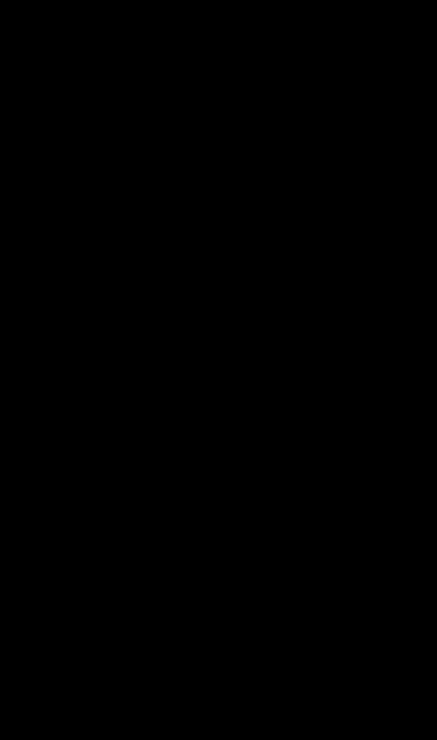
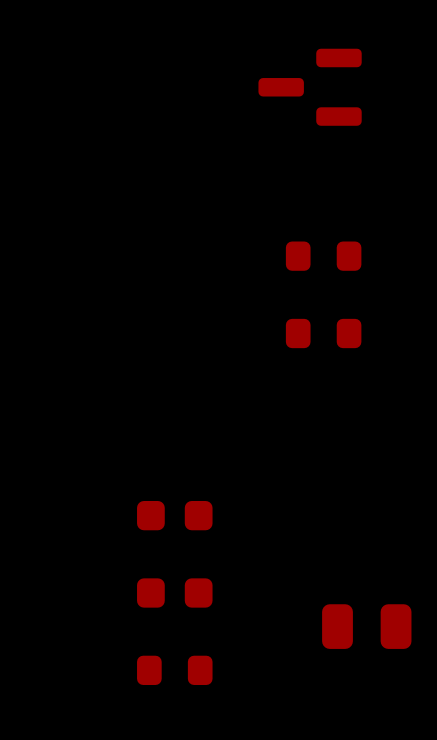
part: none -> (310, 87)
part: none -> (323, 256)
part: none -> (323, 333)
part: none -> (174, 515)
part: none -> (174, 592)
part: none -> (366, 626)
part: none -> (174, 670)

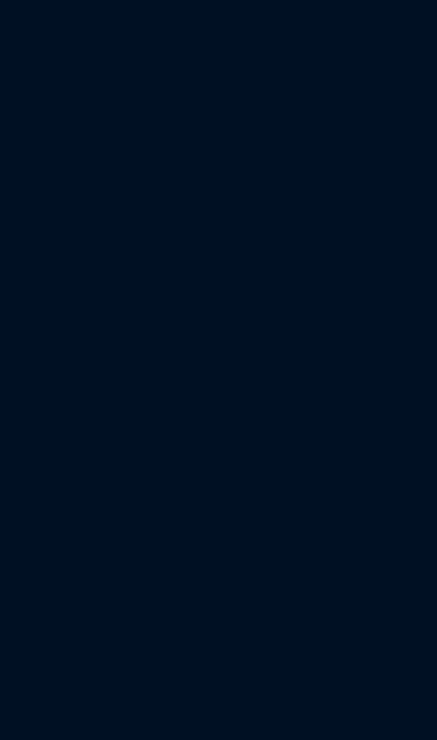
part: (310, 87) -> none
part: (323, 256) -> none
part: (323, 333) -> none
part: (174, 515) -> none
part: (174, 592) -> none
part: (366, 626) -> none
part: (174, 670) -> none

